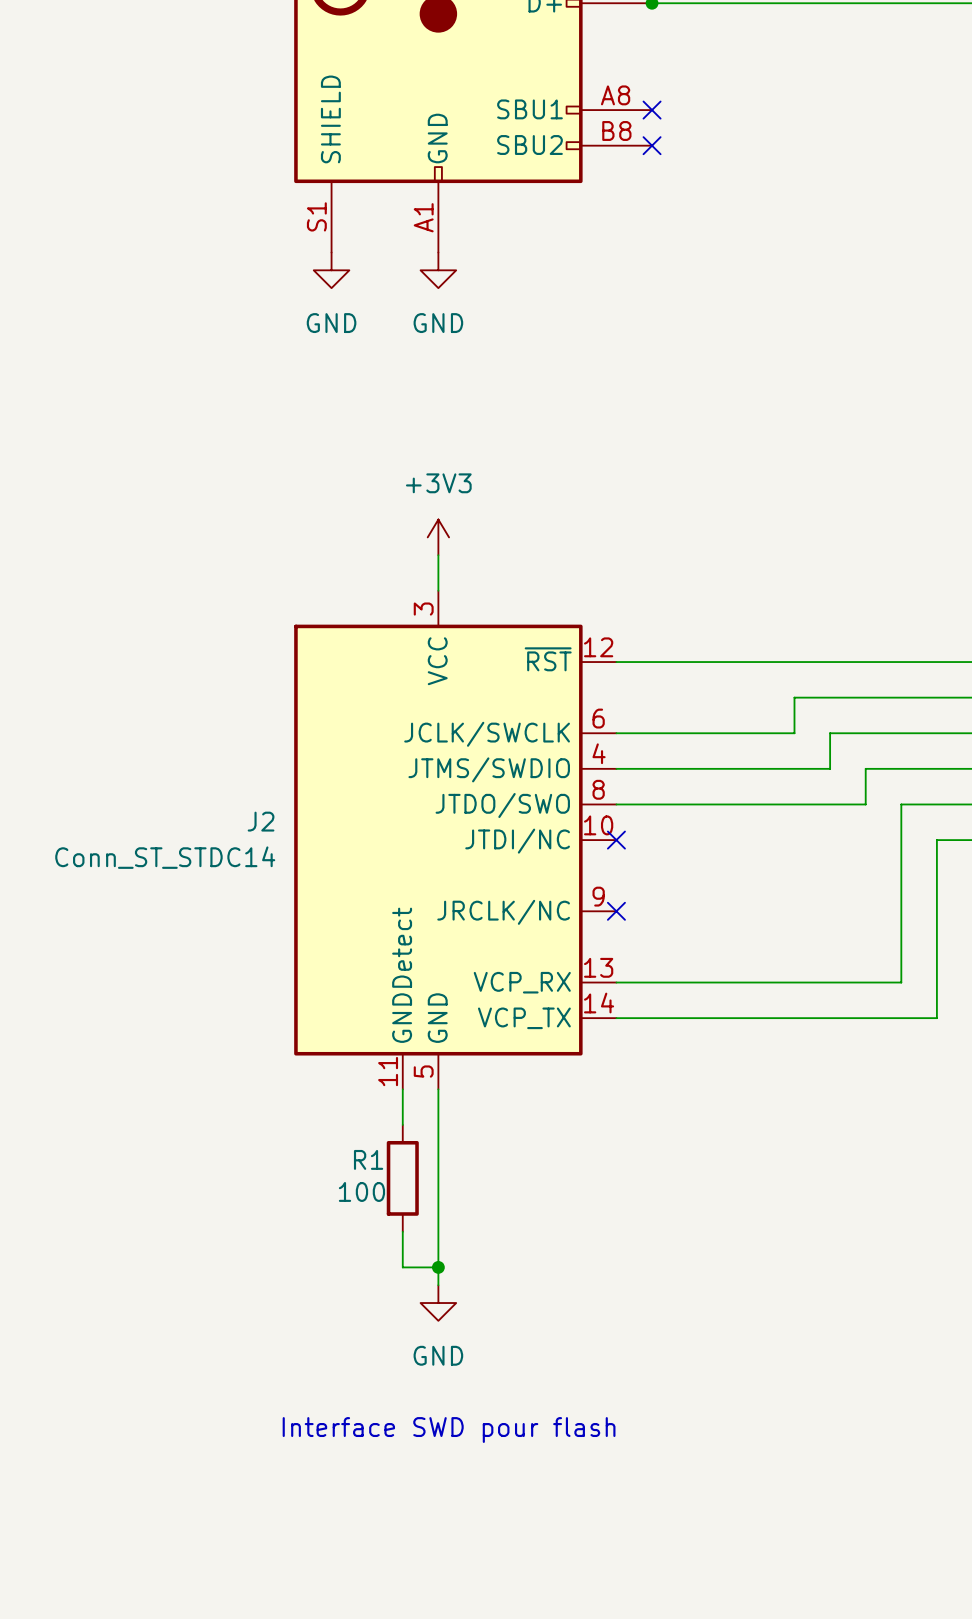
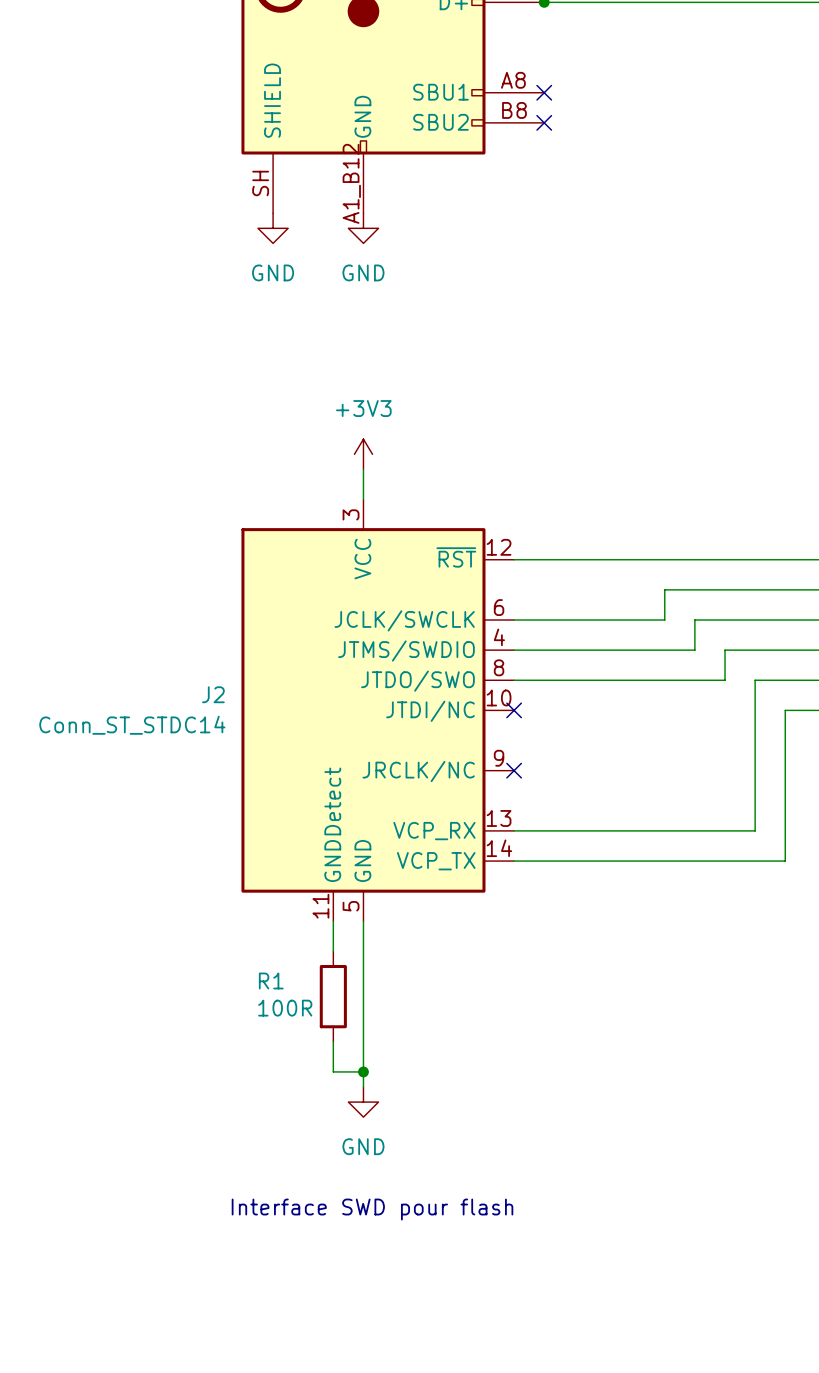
part pin number: S1 (316, 216) -> SH (260, 183)
part pin number: A1 (423, 217) -> A1_B12 (351, 183)
R1 name position: R1 (368, 1159) -> R1 (271, 981)
R1 value: 100 (361, 1191) -> 100R (285, 1008)

